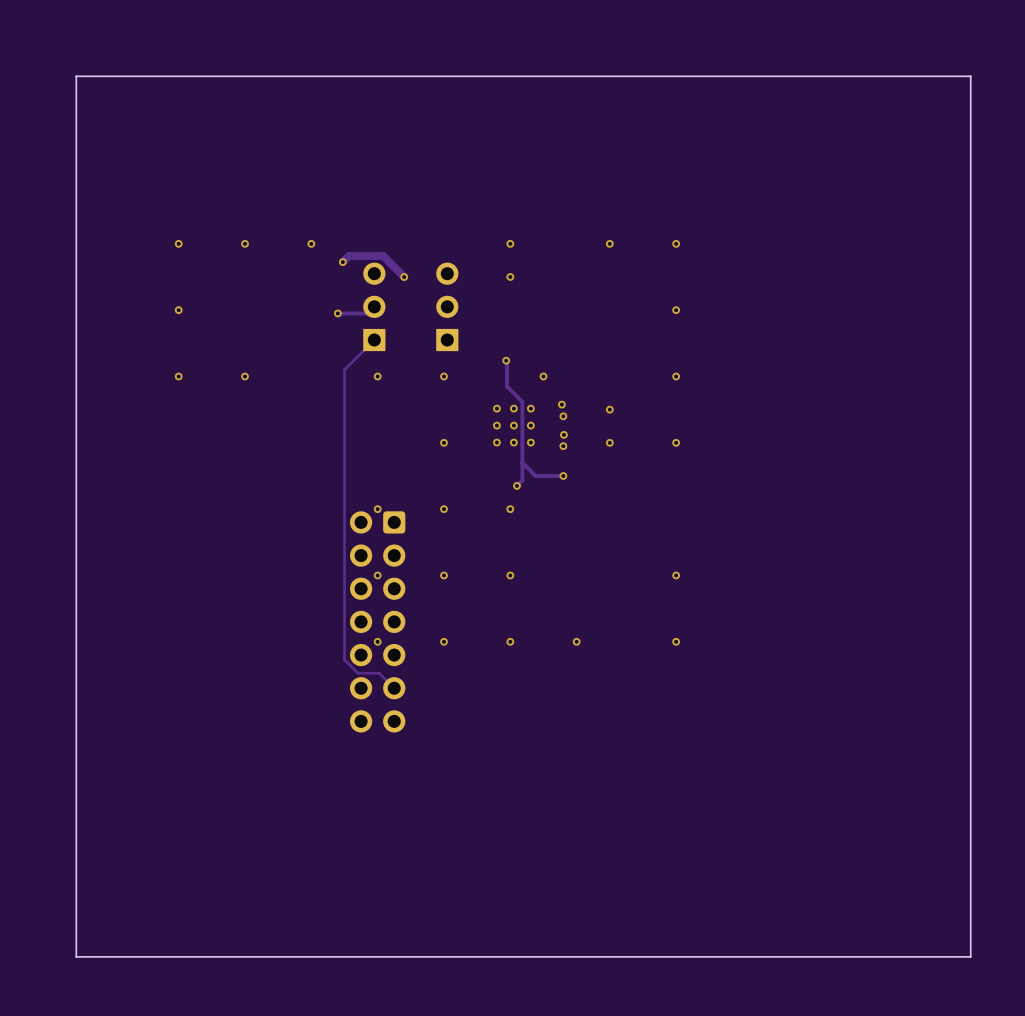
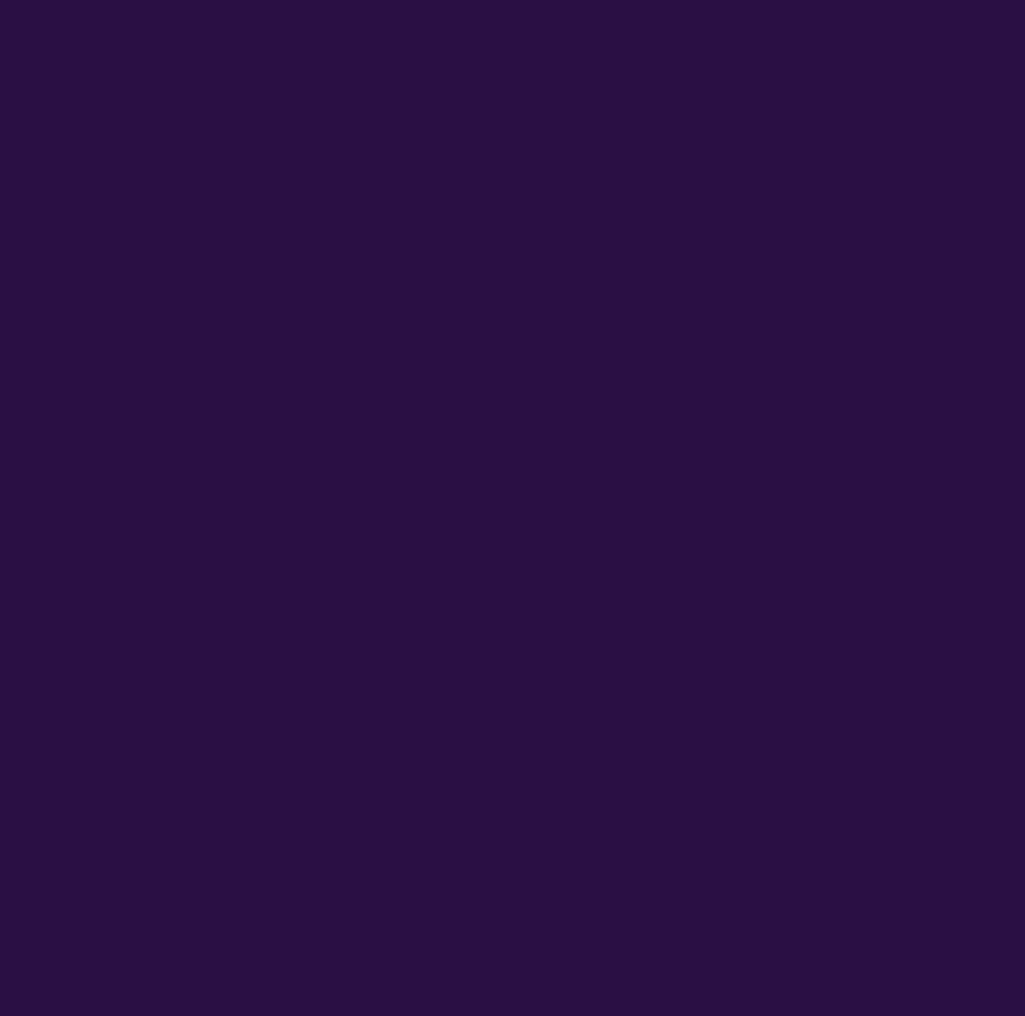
board edge: (970, 76) (76, 76) (76, 956) (970, 956) (970, 76) -> none
via: (178, 243) -> none
via: (245, 243) -> none
via: (311, 243) -> none
via: (510, 243) -> none
via: (609, 243) -> none
via: (676, 243) -> none
track: (342, 262) (348, 256) (383, 256) (404, 277) -> none
via: (342, 262) -> none
via: (404, 277) -> none
via: (510, 277) -> none
track: (374, 306) (367, 313) (337, 313) -> none
part: (374, 306) -> none
part: (447, 306) -> none
via: (178, 310) -> none
via: (676, 310) -> none
via: (337, 313) -> none
track: (374, 340) (344, 369) (344, 659) (358, 673) (379, 673) (394, 688) -> none
track: (506, 360) (507, 386) (522, 401) (522, 480) (516, 485) -> none
via: (506, 360) -> none
via: (178, 376) -> none
via: (245, 376) -> none
via: (377, 376) -> none
via: (443, 376) -> none
via: (543, 376) -> none
via: (676, 376) -> none
via: (561, 404) -> none
via: (496, 408) -> none
via: (513, 408) -> none
via: (530, 408) -> none
via: (609, 409) -> none
via: (563, 416) -> none
via: (496, 425) -> none
via: (513, 425) -> none
via: (530, 425) -> none
via: (563, 434) -> none
via: (443, 442) -> none
via: (496, 442) -> none
via: (513, 442) -> none
via: (530, 442) -> none
via: (609, 442) -> none
via: (676, 442) -> none
via: (563, 446) -> none
track: (522, 462) (535, 475) (563, 475) -> none
via: (563, 475) -> none
via: (516, 485) -> none
via: (377, 509) -> none
via: (443, 509) -> none
via: (510, 509) -> none
via: (377, 575) -> none
via: (443, 575) -> none
via: (510, 575) -> none
via: (676, 575) -> none
part: (377, 621) -> none
via: (377, 641) -> none
via: (443, 641) -> none
via: (510, 641) -> none
via: (576, 641) -> none
via: (676, 641) -> none

